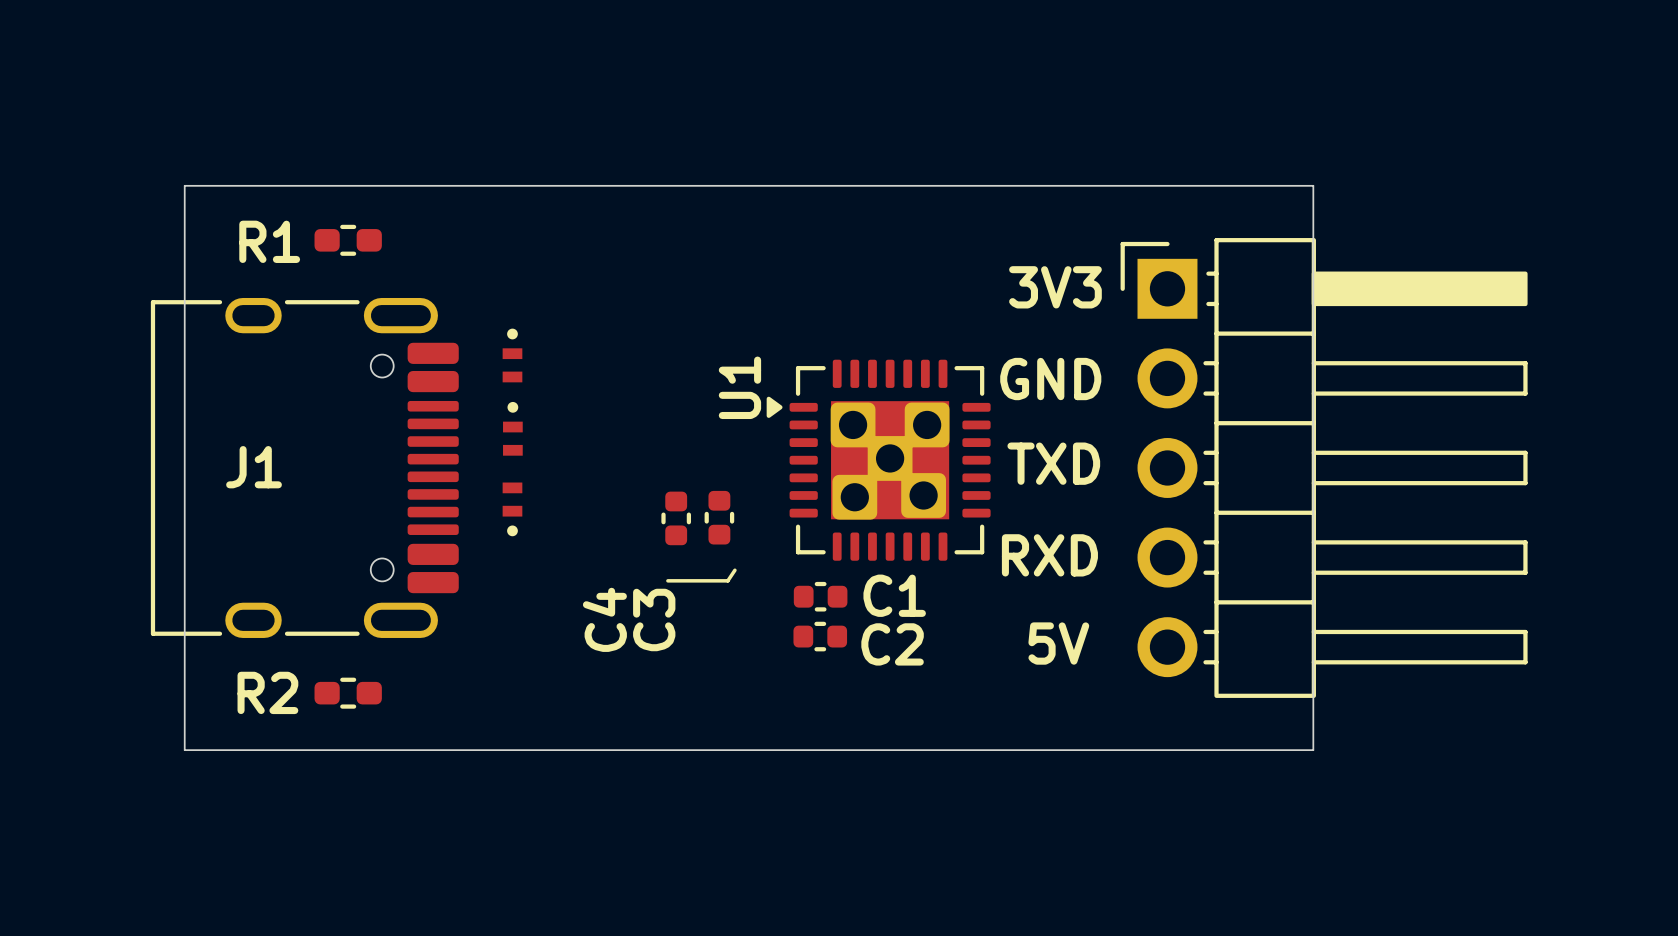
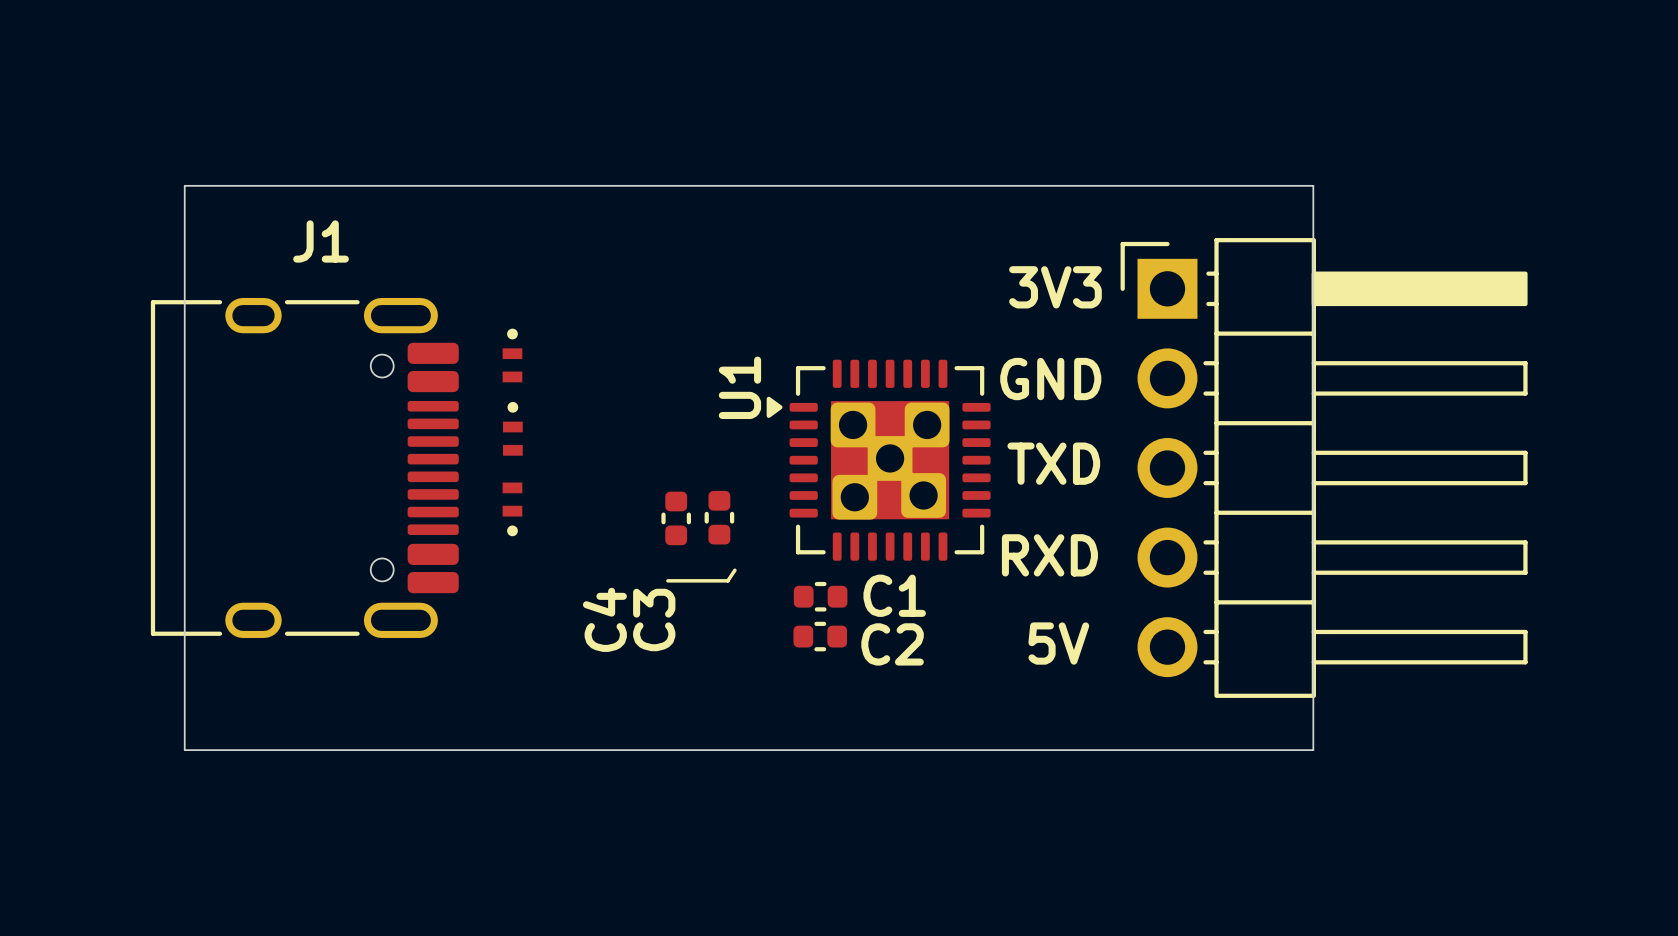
R1: (348, 240) -> none
text position: J1 (254, 467) -> J1 (321, 241)
R2: (348, 693) -> none

